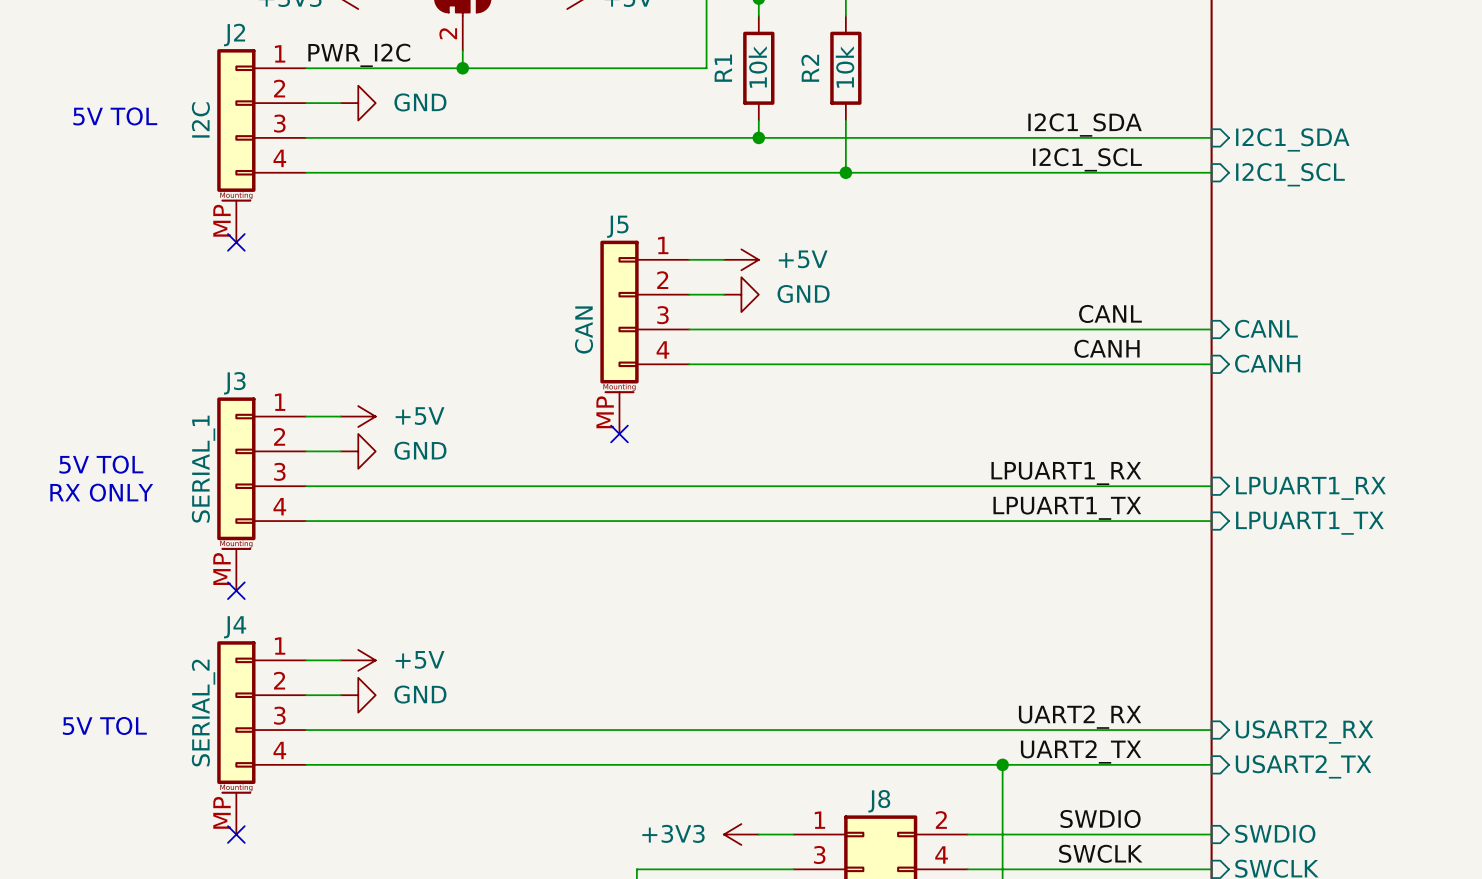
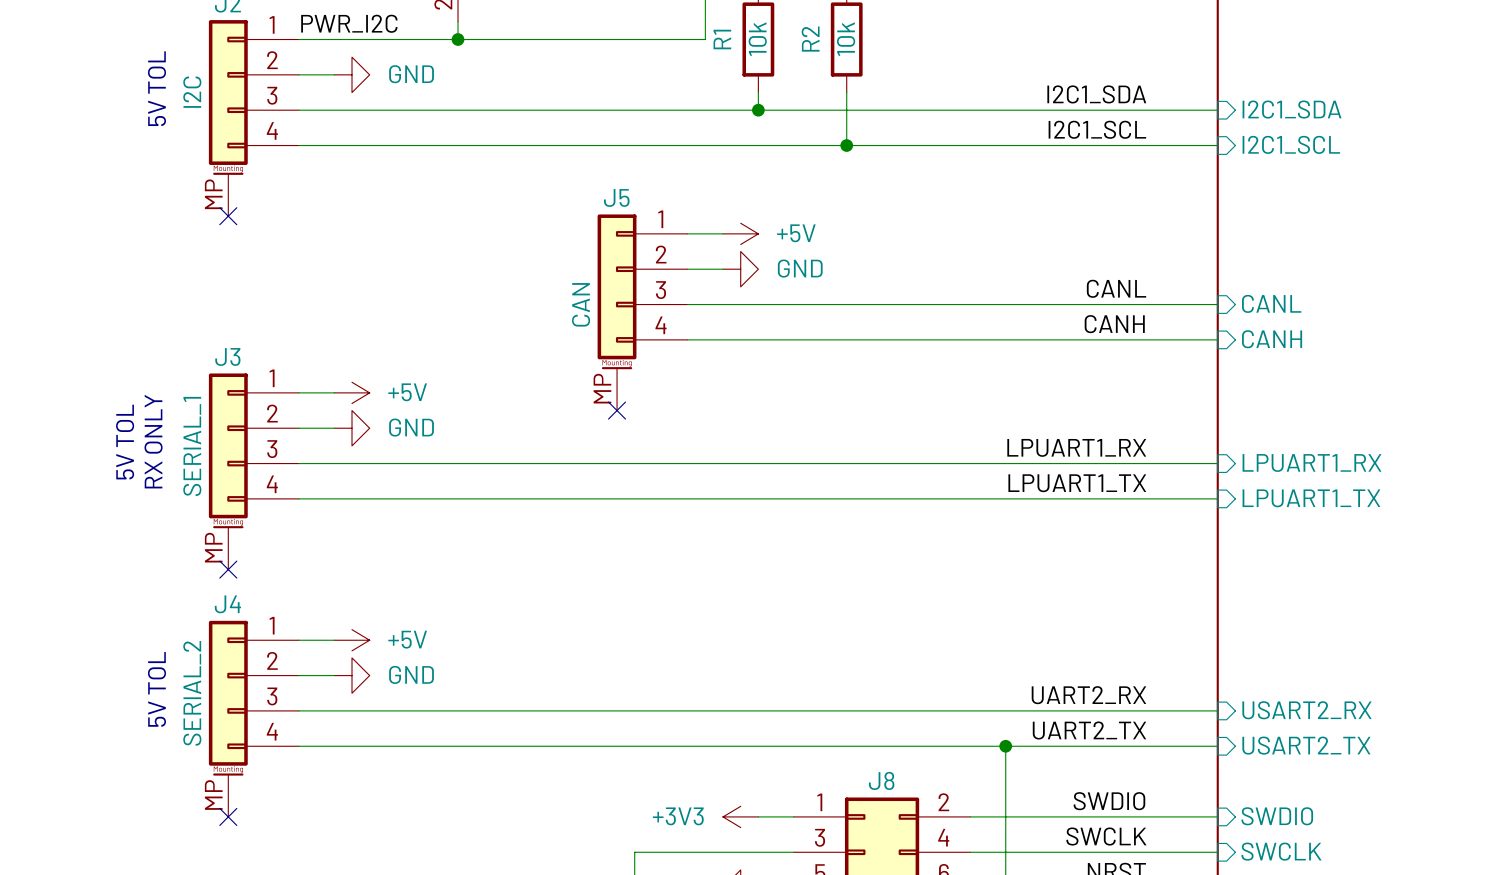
text rotation: 0° (115, 116) -> 90° counterclockwise (156, 88)
text rotation: 0° (101, 464) -> 90° counterclockwise (125, 442)
text rotation: 0° (101, 492) -> 90° counterclockwise (153, 441)
text rotation: 0° (104, 725) -> 90° counterclockwise (156, 689)

